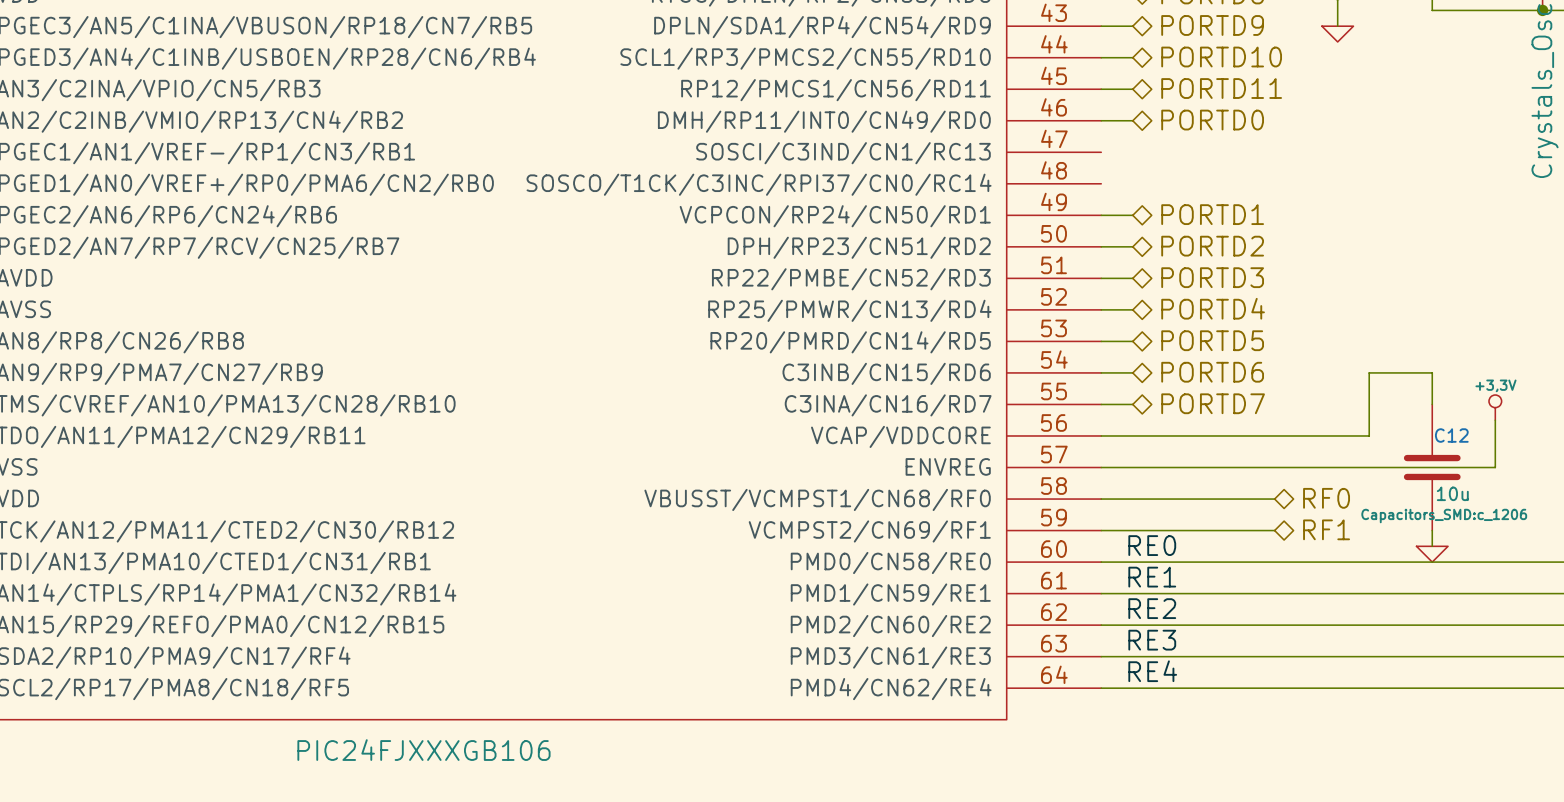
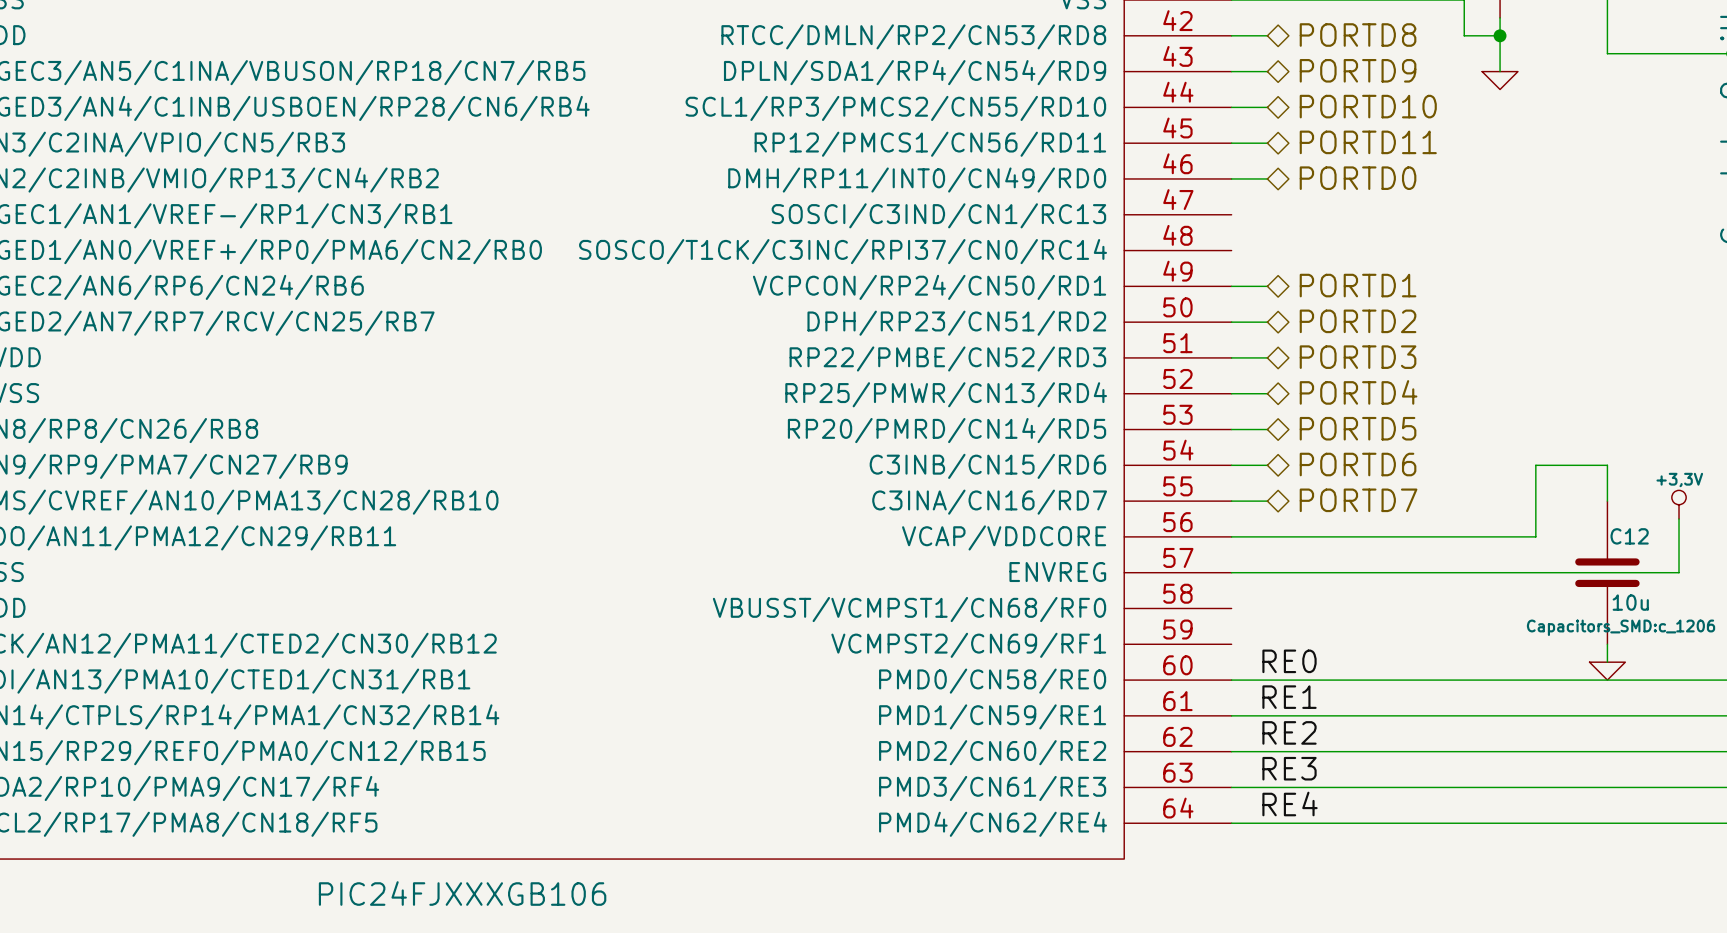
hierarchical label: RF0 (1326, 498) -> none
wire: (1101, 499) (1274, 499) -> none
hierarchical label: RF1 (1326, 529) -> none
wire: (1101, 530) (1274, 530) -> none

